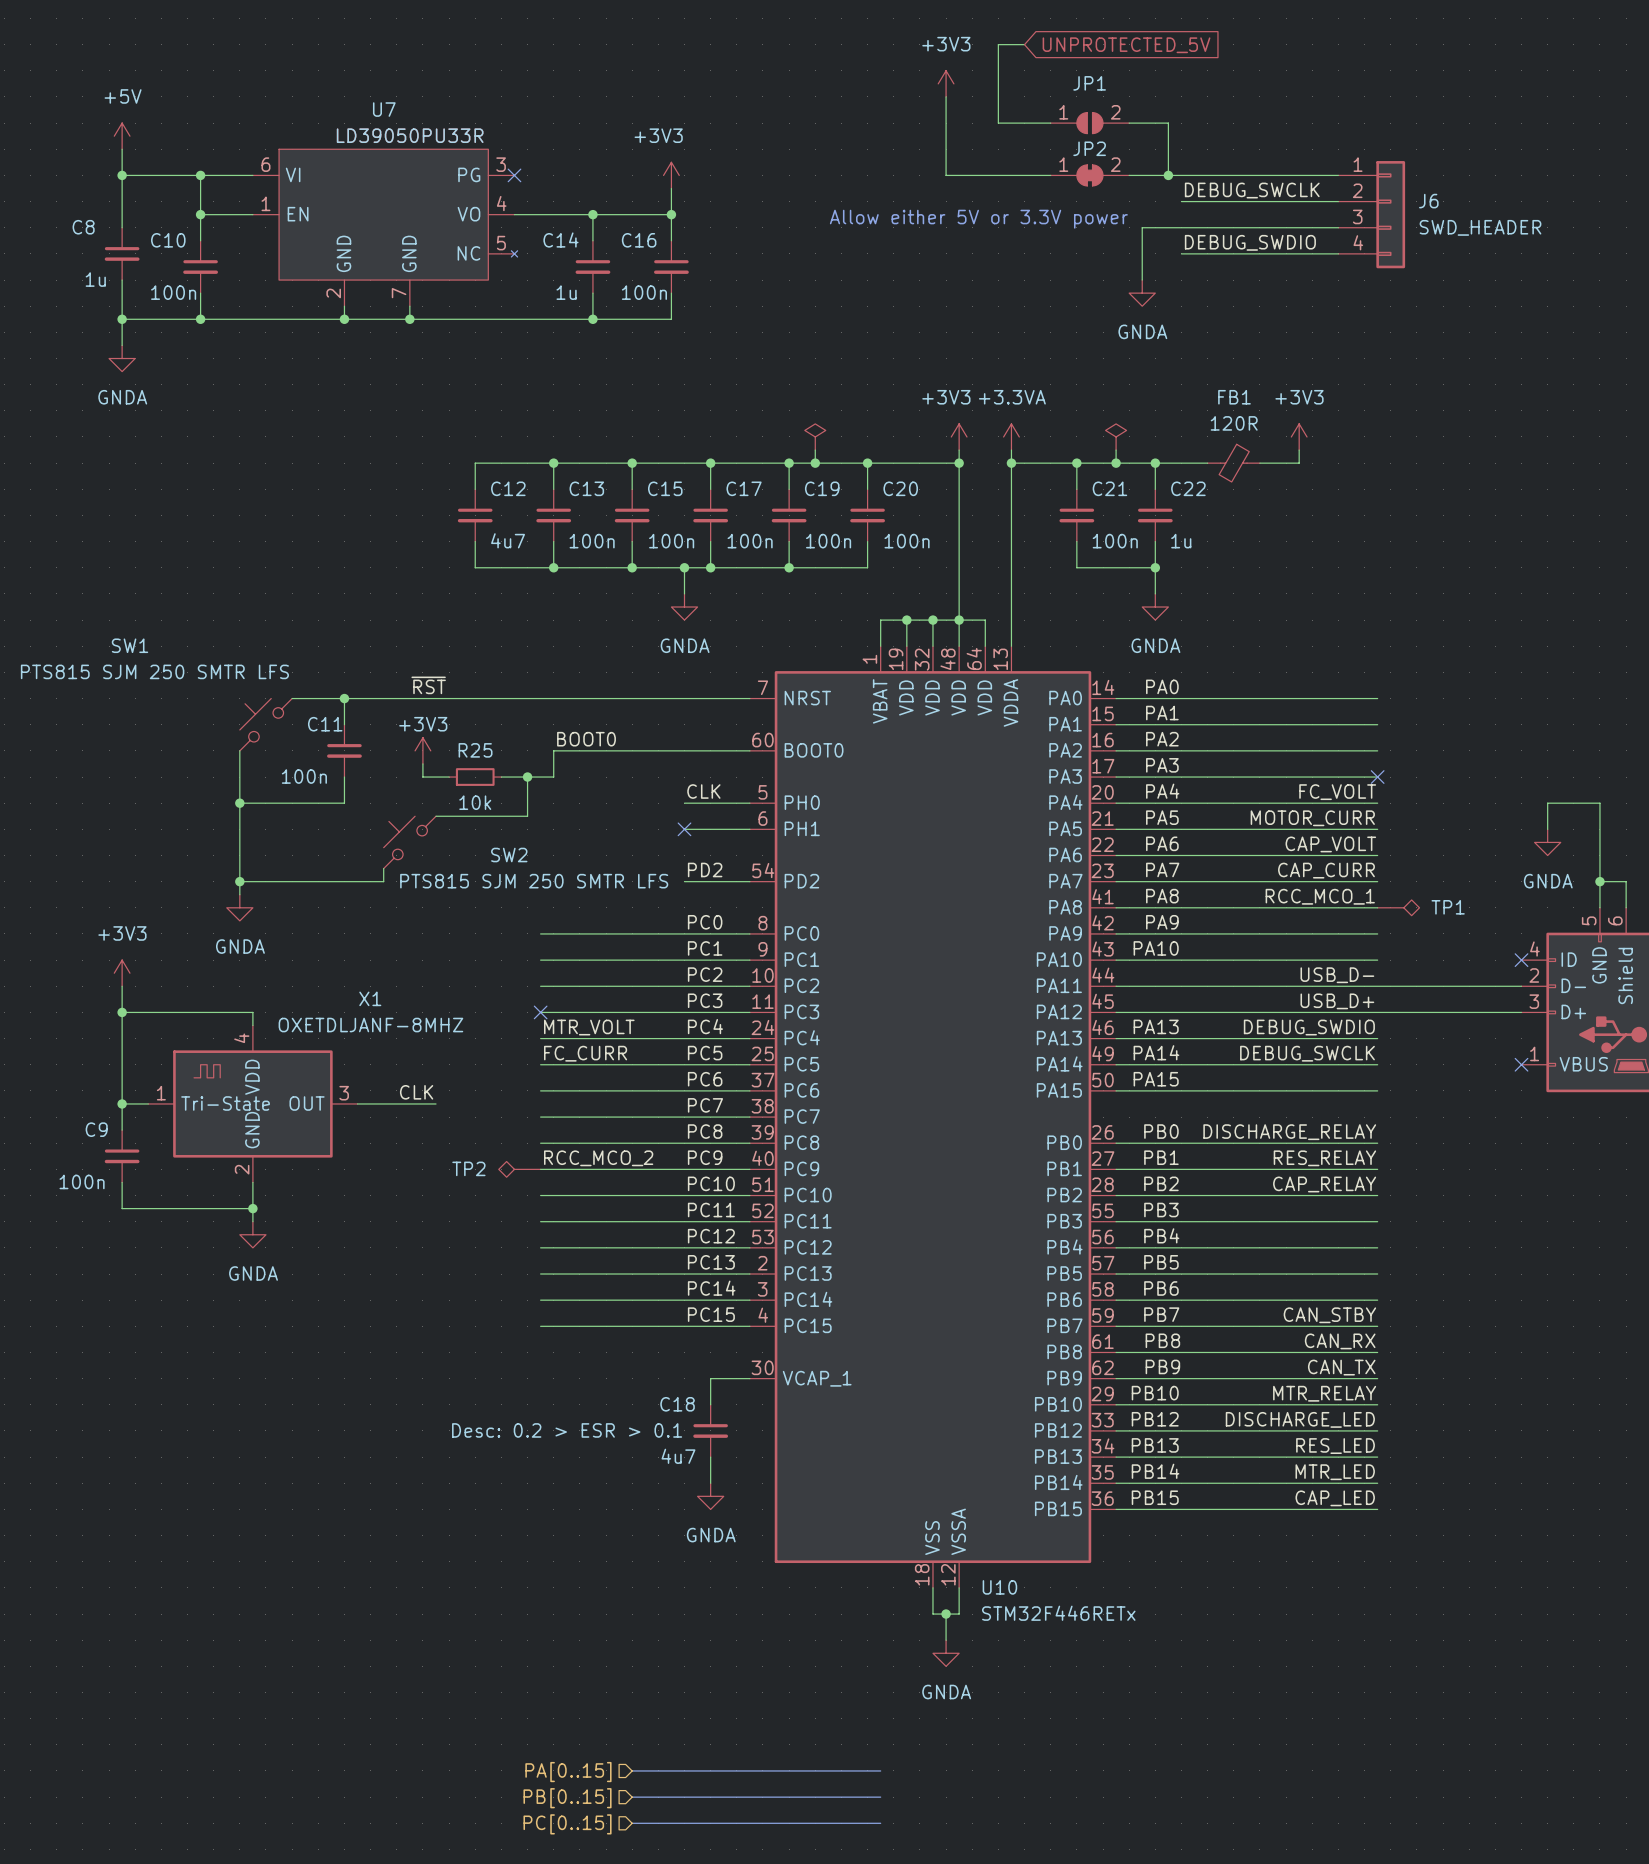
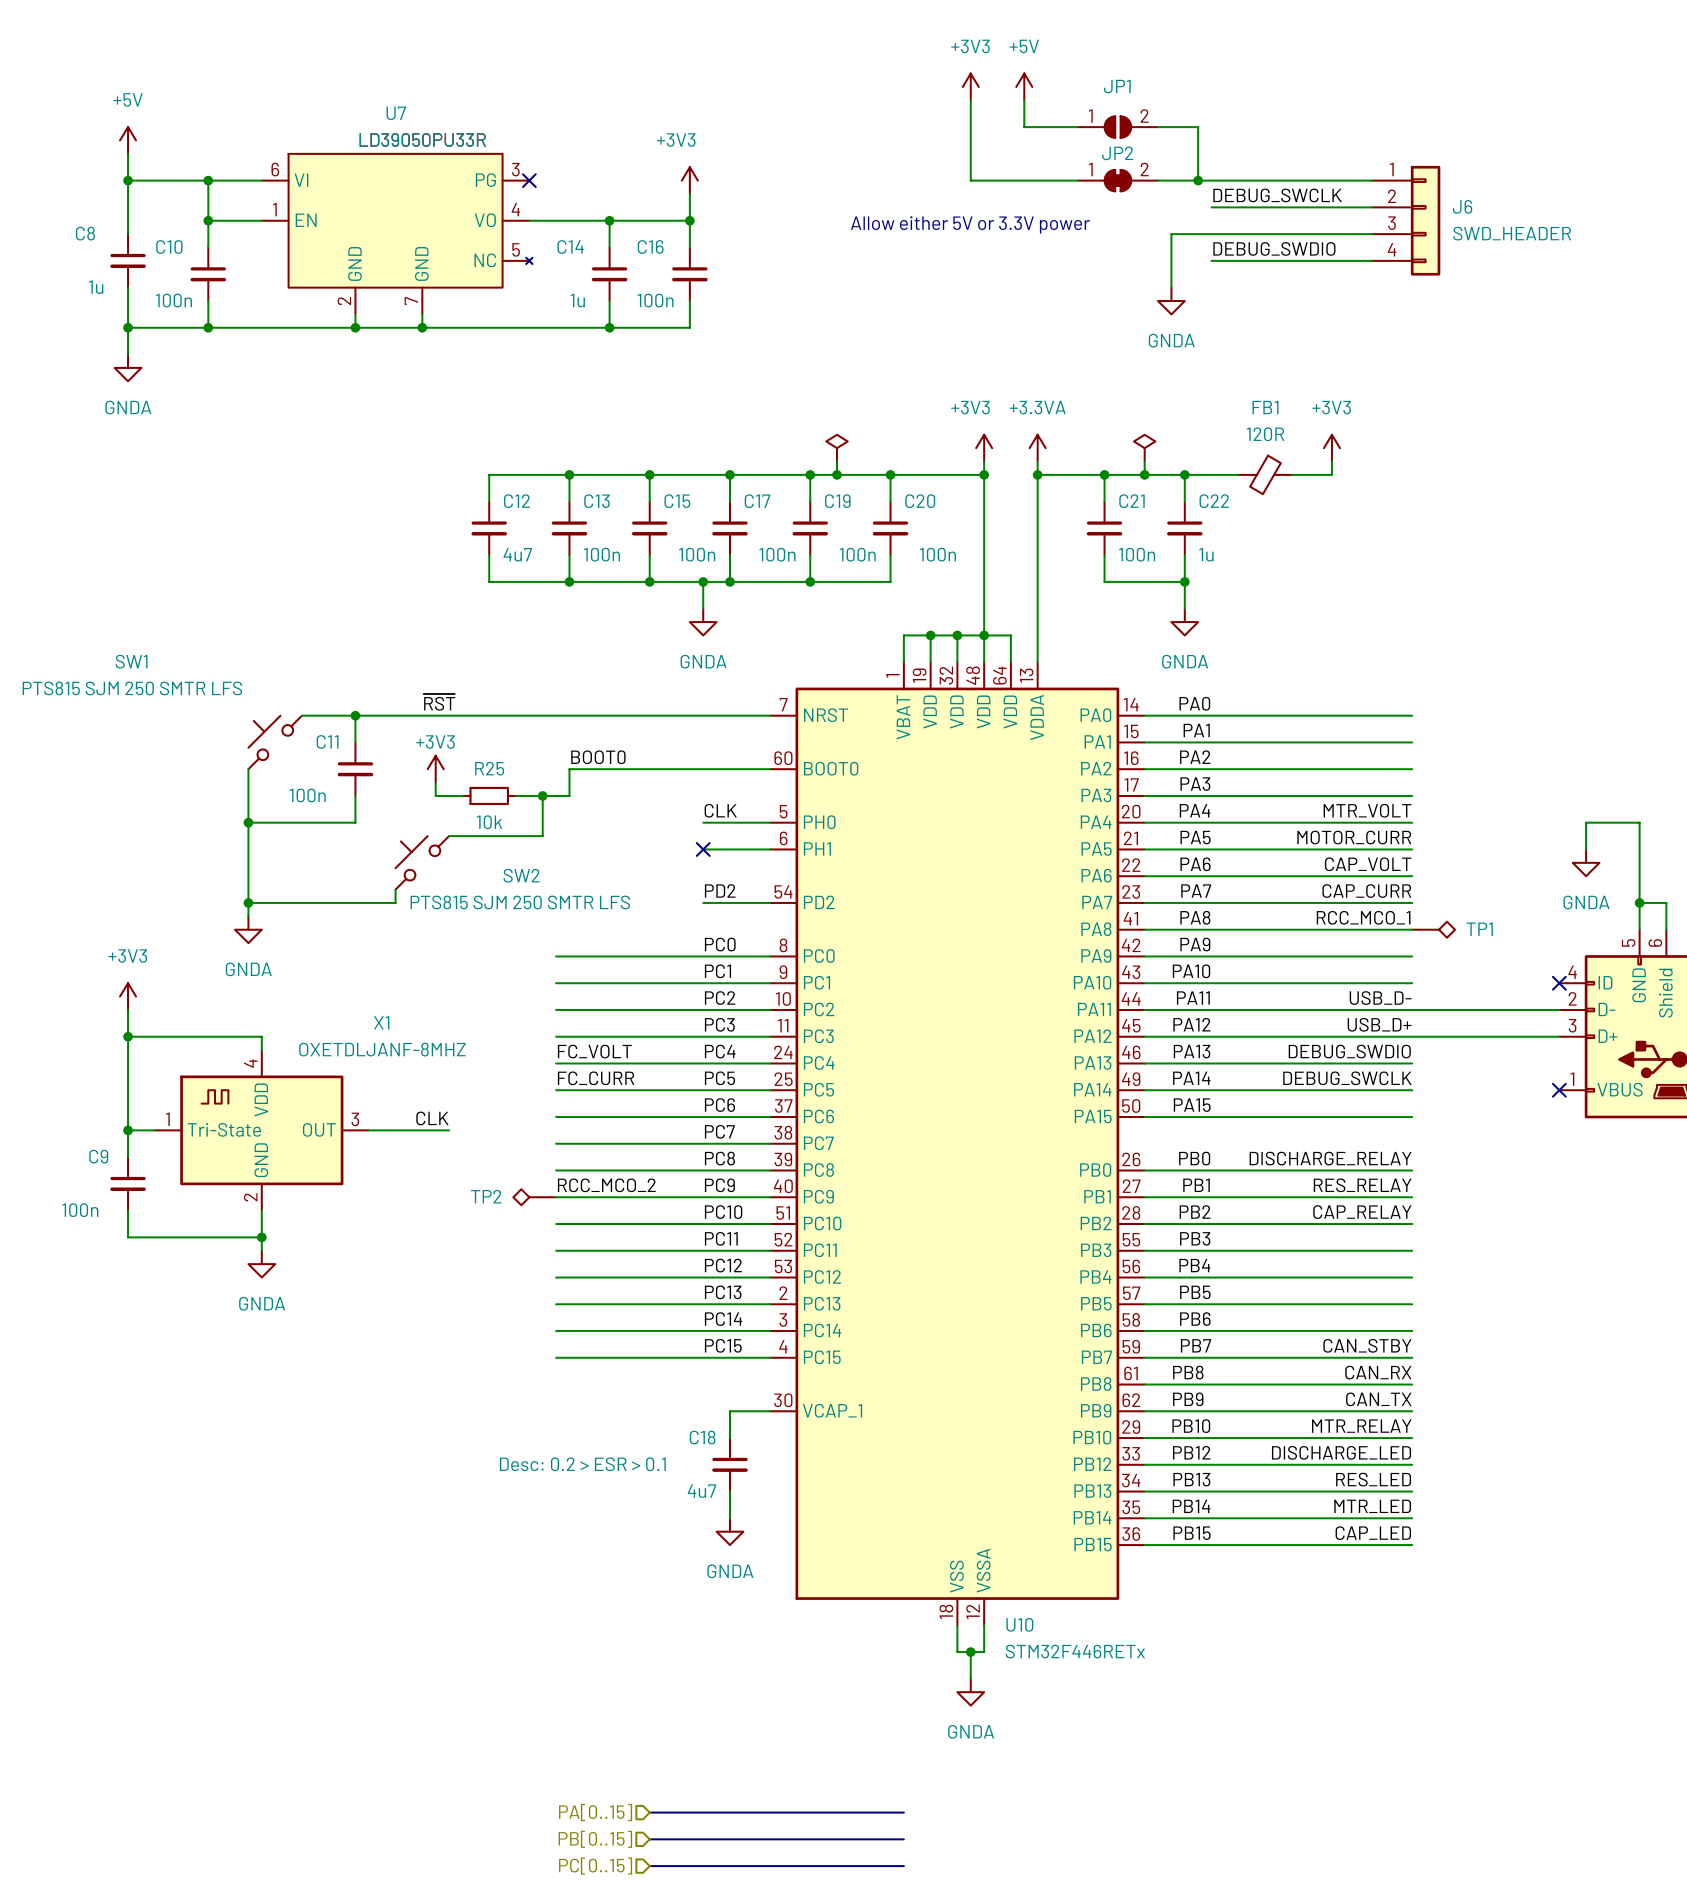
wire: (1024, 44) (998, 44) (998, 96) -> none
global label: UNPROTECTED_5V (1126, 45) -> none
power symbol: none -> +5V (1024, 86)
no-connect mark: (1377, 777) -> none
label: FC_VOLT (1337, 792) -> MTR_VOLT (1367, 810)
label: none -> PA11 (1193, 998)
label: none -> PA12 (1191, 1024)
no-connect mark: (540, 1012) -> none
label: MTR_VOLT (589, 1027) -> FC_VOLT (594, 1051)

